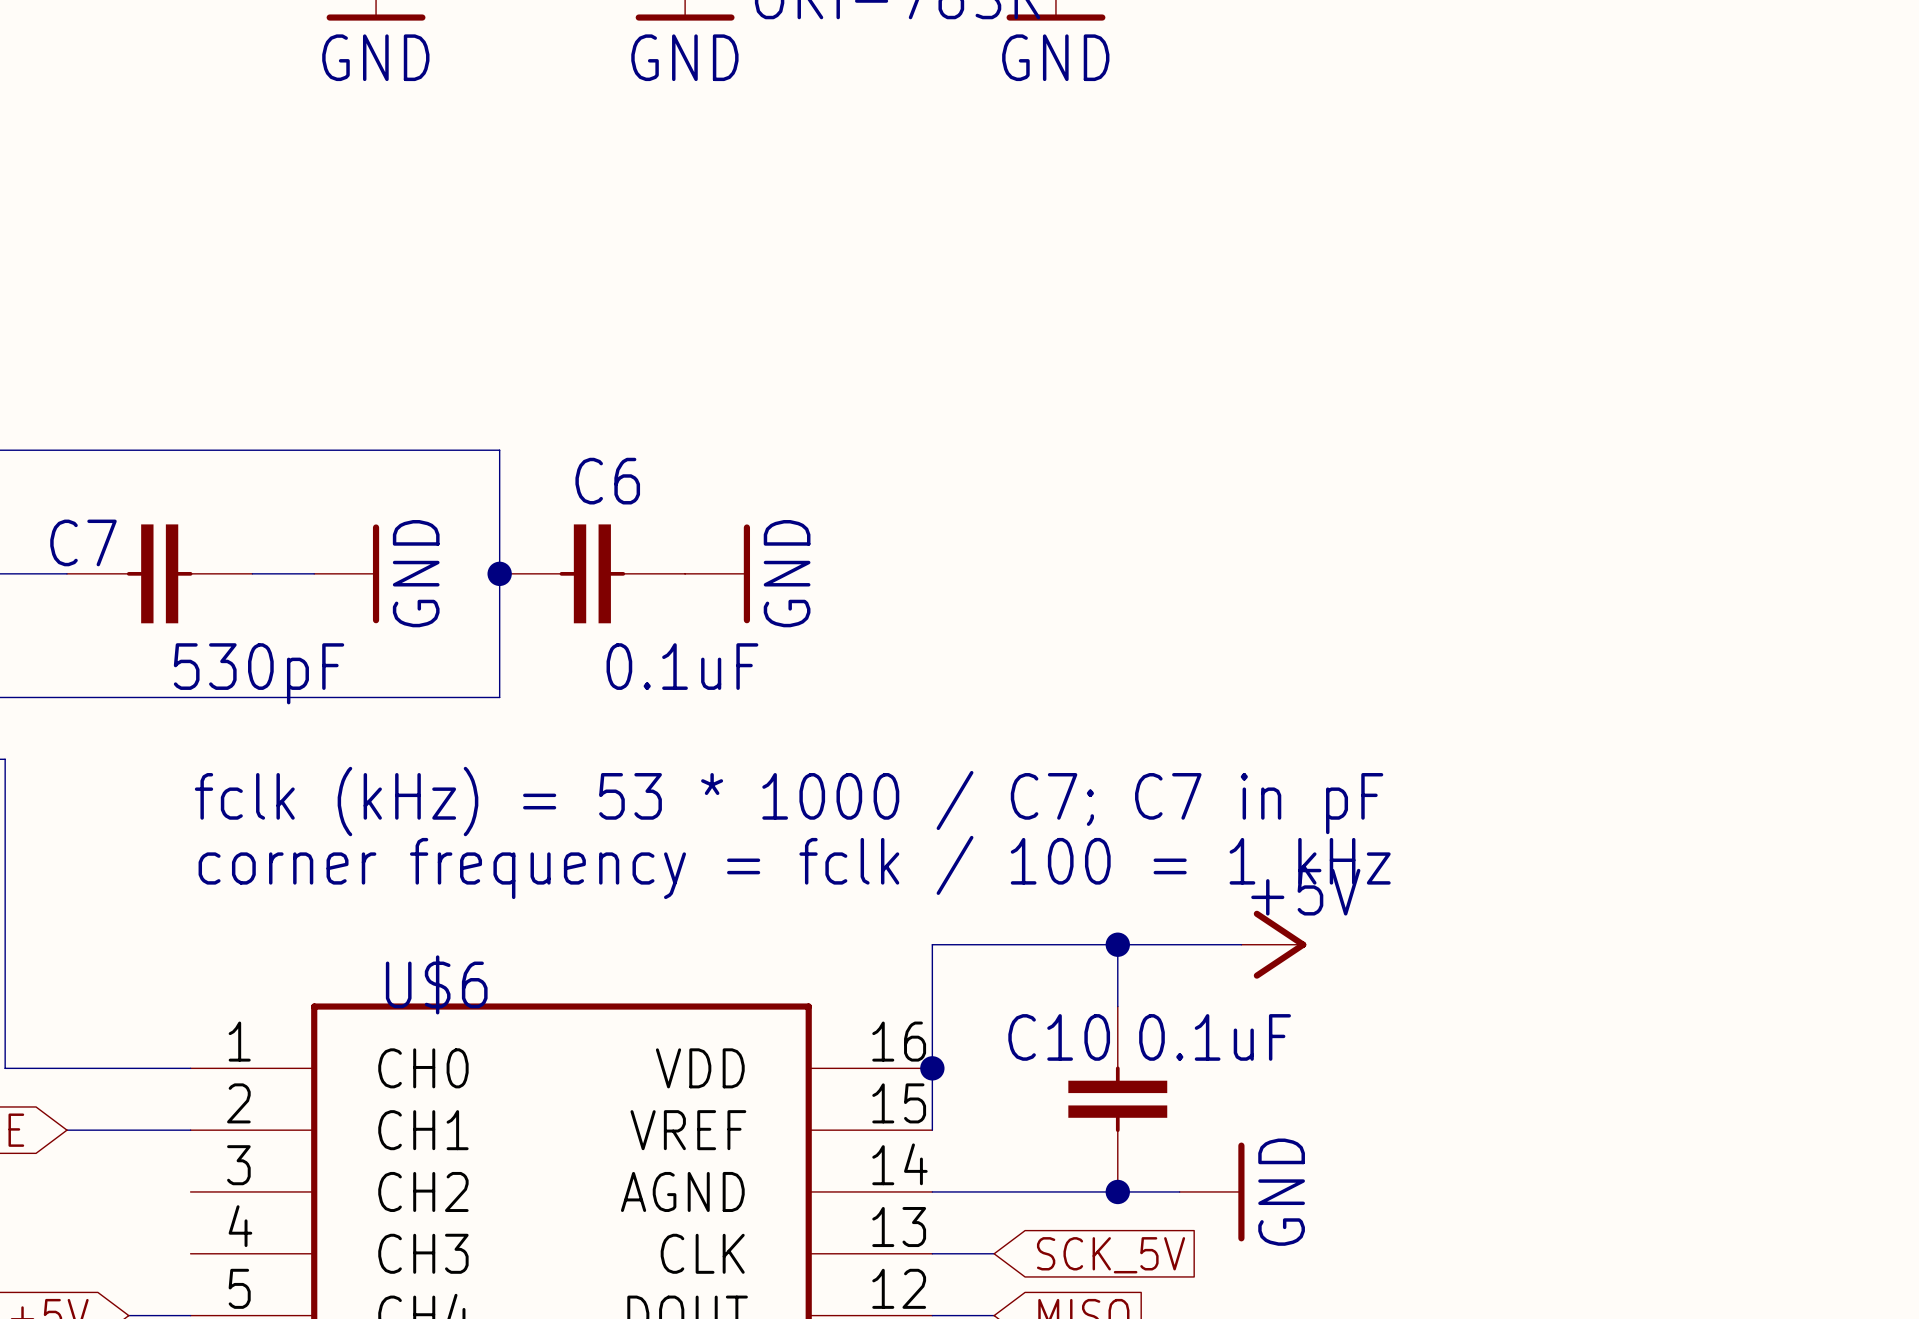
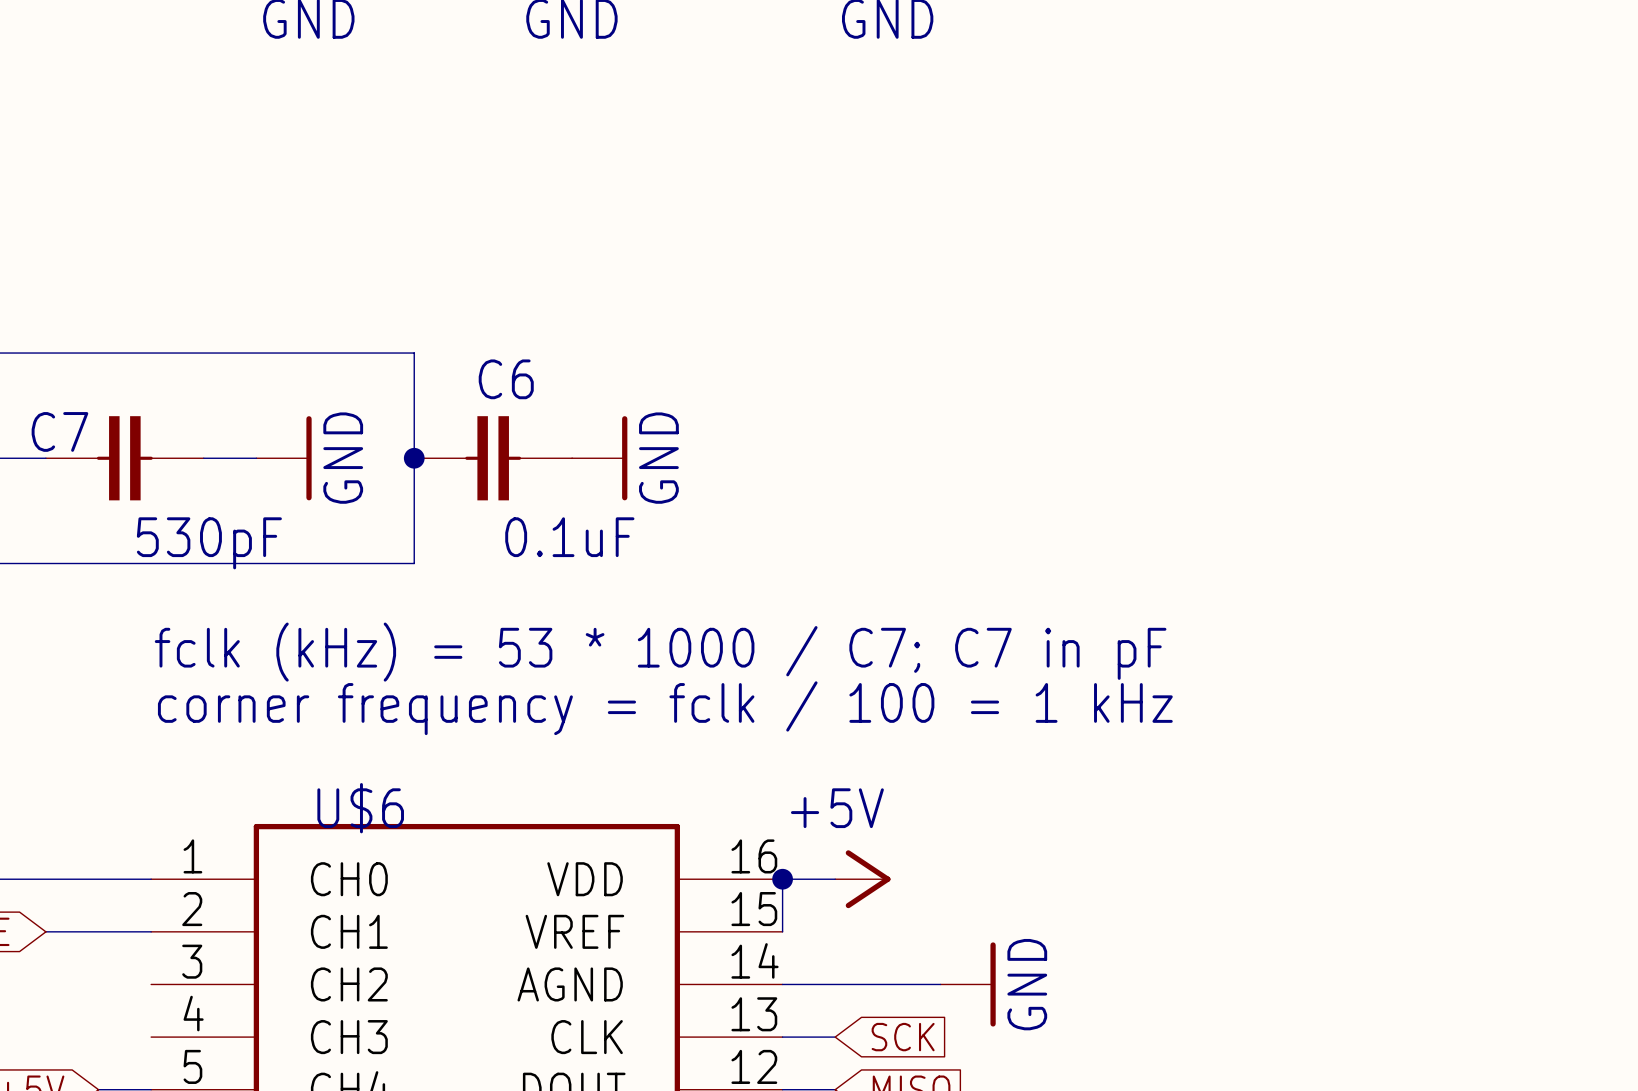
power symbol text position: +5V (1305, 892) -> +5V (837, 808)
wire: (1117, 944) (1117, 1006) -> none
junction: (1117, 944) -> none
wire: (1241, 944) (932, 944) (932, 1068) -> (835, 879) (782, 879)
power symbol position: +5V (1273, 944) -> +5V (862, 879)
C10: 0.1uF (1117, 1099) -> none
junction: (1117, 1191) -> none
power symbol position: GND (1212, 1191) -> GND (968, 984)
global label: SCK_5V (1111, 1255) -> SCK (903, 1037)

